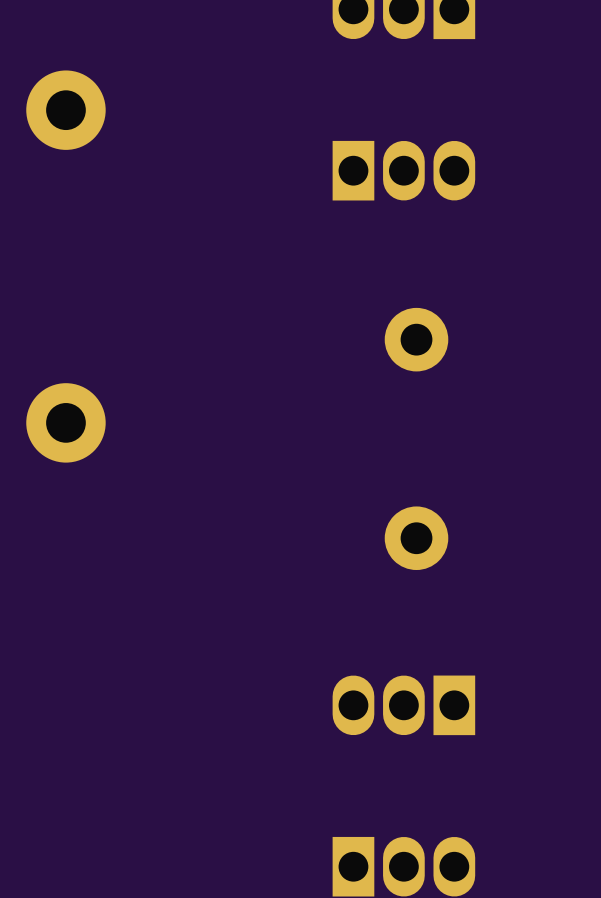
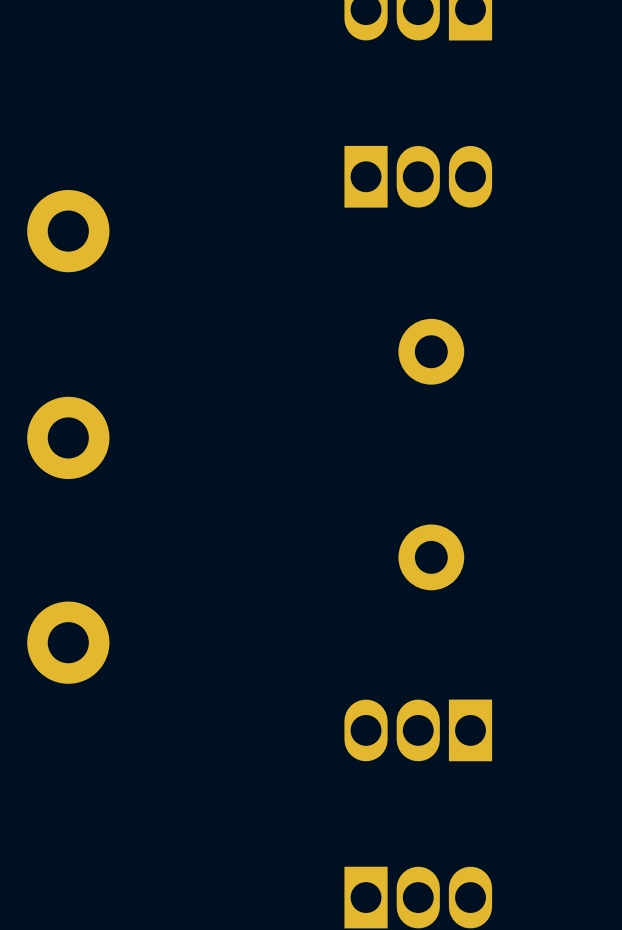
part position: (65, 110) -> (68, 231)
part: none -> (68, 642)

